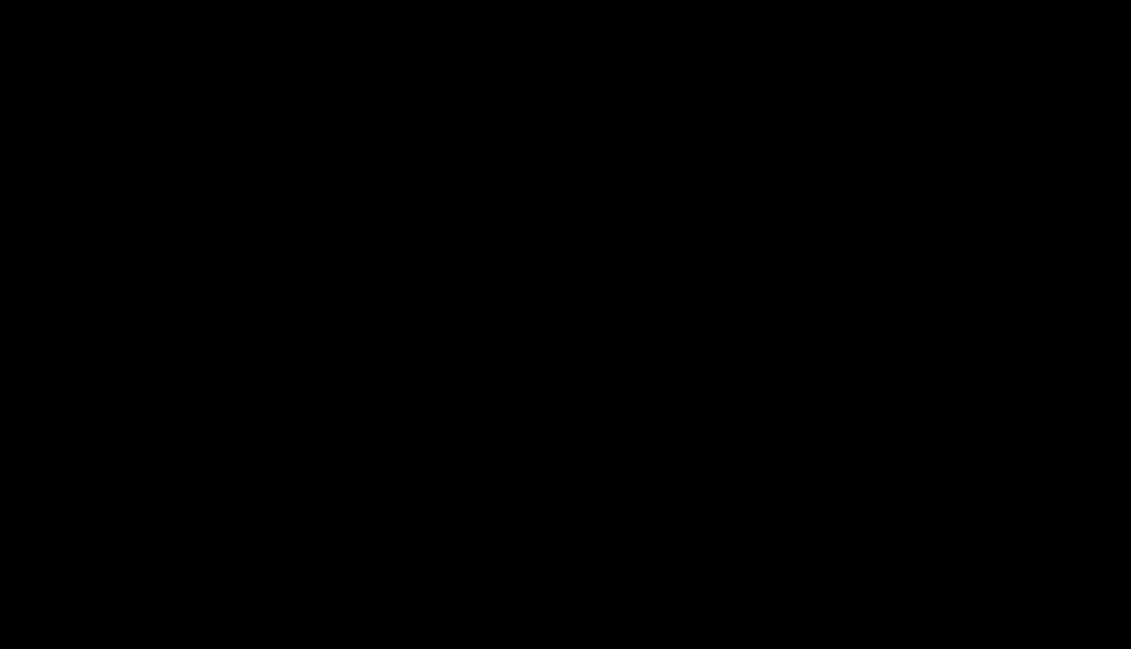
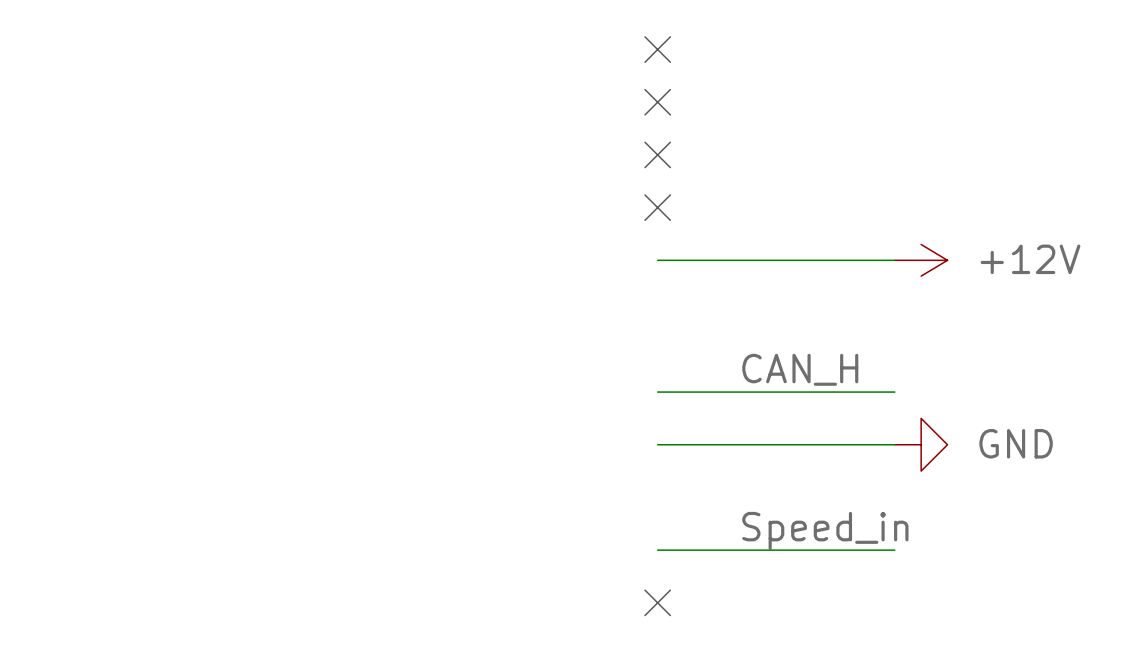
no-connect mark: none -> (657, 49)
no-connect mark: none -> (657, 102)
no-connect mark: none -> (657, 154)
no-connect mark: none -> (657, 207)
wire: none -> (657, 260) (894, 260)
power symbol: none -> +12V (921, 260)
label: none -> CAN_H (800, 369)
wire: none -> (657, 392) (894, 392)
wire: none -> (657, 444) (894, 444)
power symbol: none -> GND (921, 444)
label: none -> Speed_in (825, 531)
wire: none -> (657, 550) (894, 550)
no-connect mark: none -> (657, 602)

